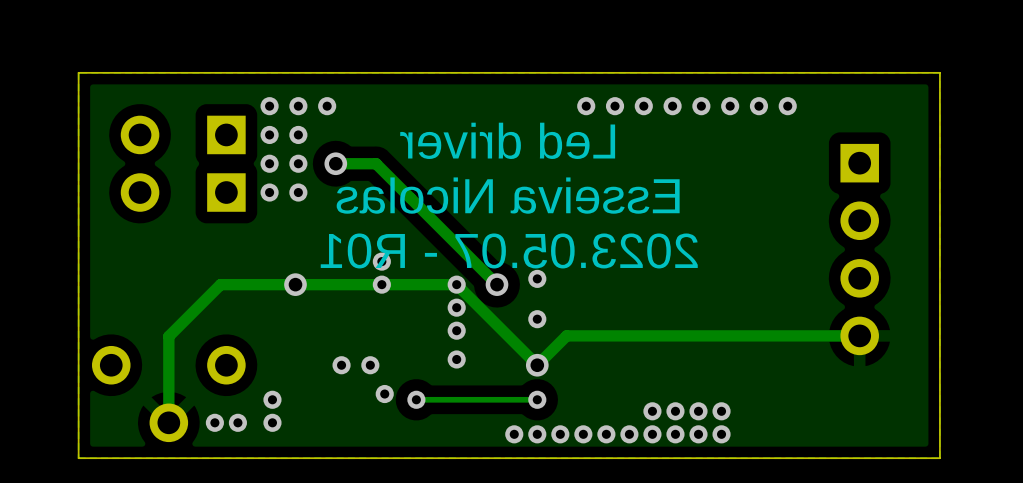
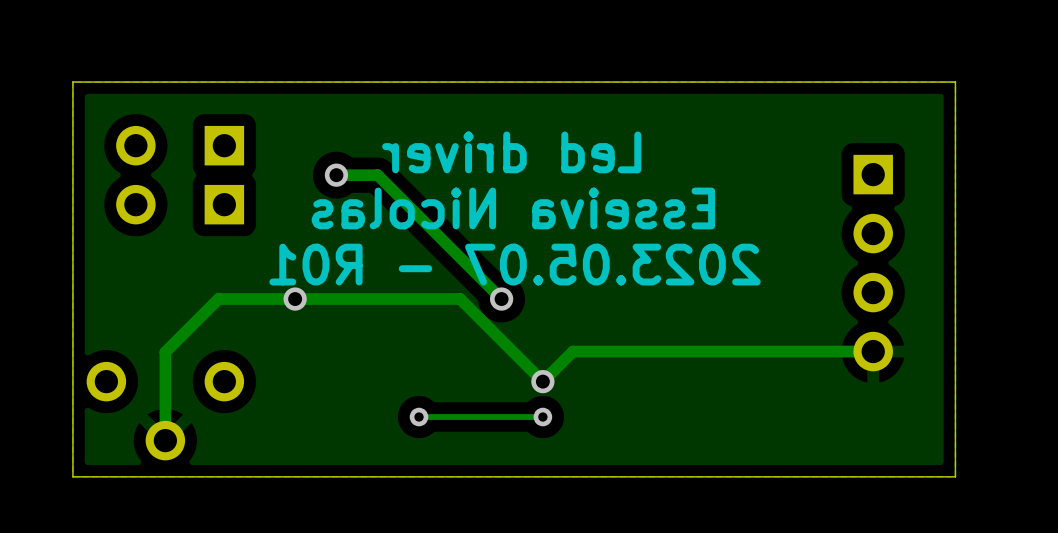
via: (269, 106) -> none
via: (298, 106) -> none
via: (327, 106) -> none
via: (586, 106) -> none
via: (615, 106) -> none
via: (643, 106) -> none
via: (672, 106) -> none
via: (701, 106) -> none
via: (730, 106) -> none
via: (758, 106) -> none
via: (787, 106) -> none
via: (269, 134) -> none
via: (298, 134) -> none
via: (269, 163) -> none
via: (298, 163) -> none
via: (269, 192) -> none
via: (298, 192) -> none
via: (381, 261) -> none
via: (537, 278) -> none
via: (381, 284) -> none
via: (456, 284) -> none
via: (456, 307) -> none
via: (537, 319) -> none
via: (456, 330) -> none
via: (456, 359) -> none
via: (341, 365) -> none
via: (370, 365) -> none
via: (384, 394) -> none
via: (272, 399) -> none
via: (652, 411) -> none
via: (675, 411) -> none
via: (698, 411) -> none
via: (721, 411) -> none
via: (214, 422) -> none
via: (237, 422) -> none
via: (272, 422) -> none
via: (514, 434) -> none
via: (537, 434) -> none
via: (560, 434) -> none
via: (583, 434) -> none
via: (606, 434) -> none
via: (629, 434) -> none
via: (652, 434) -> none
via: (675, 434) -> none
via: (698, 434) -> none
via: (721, 434) -> none

